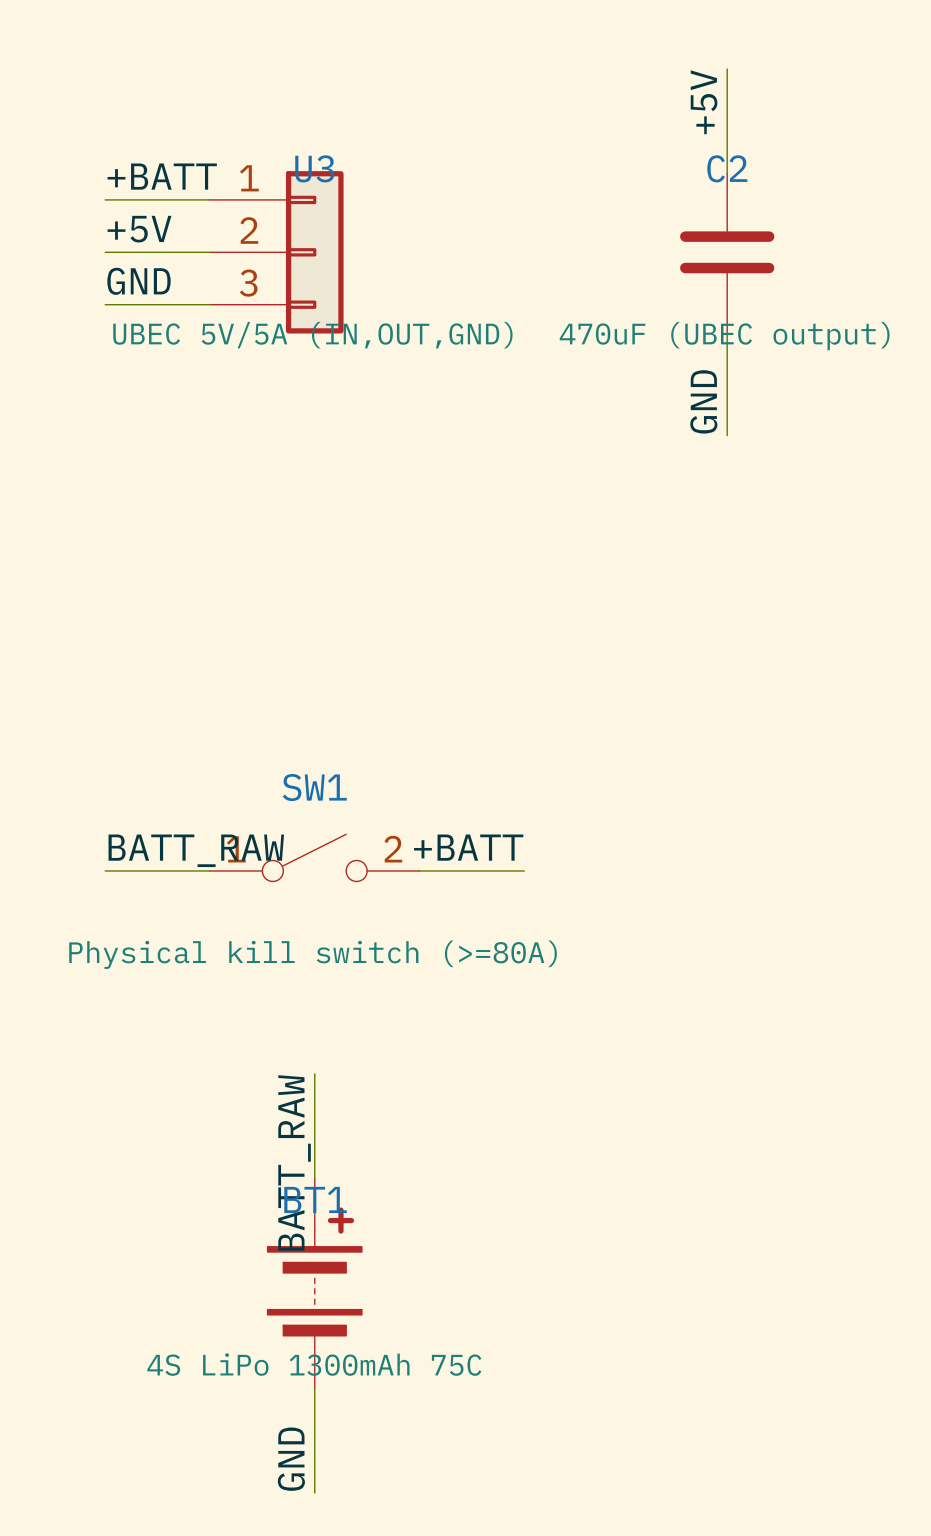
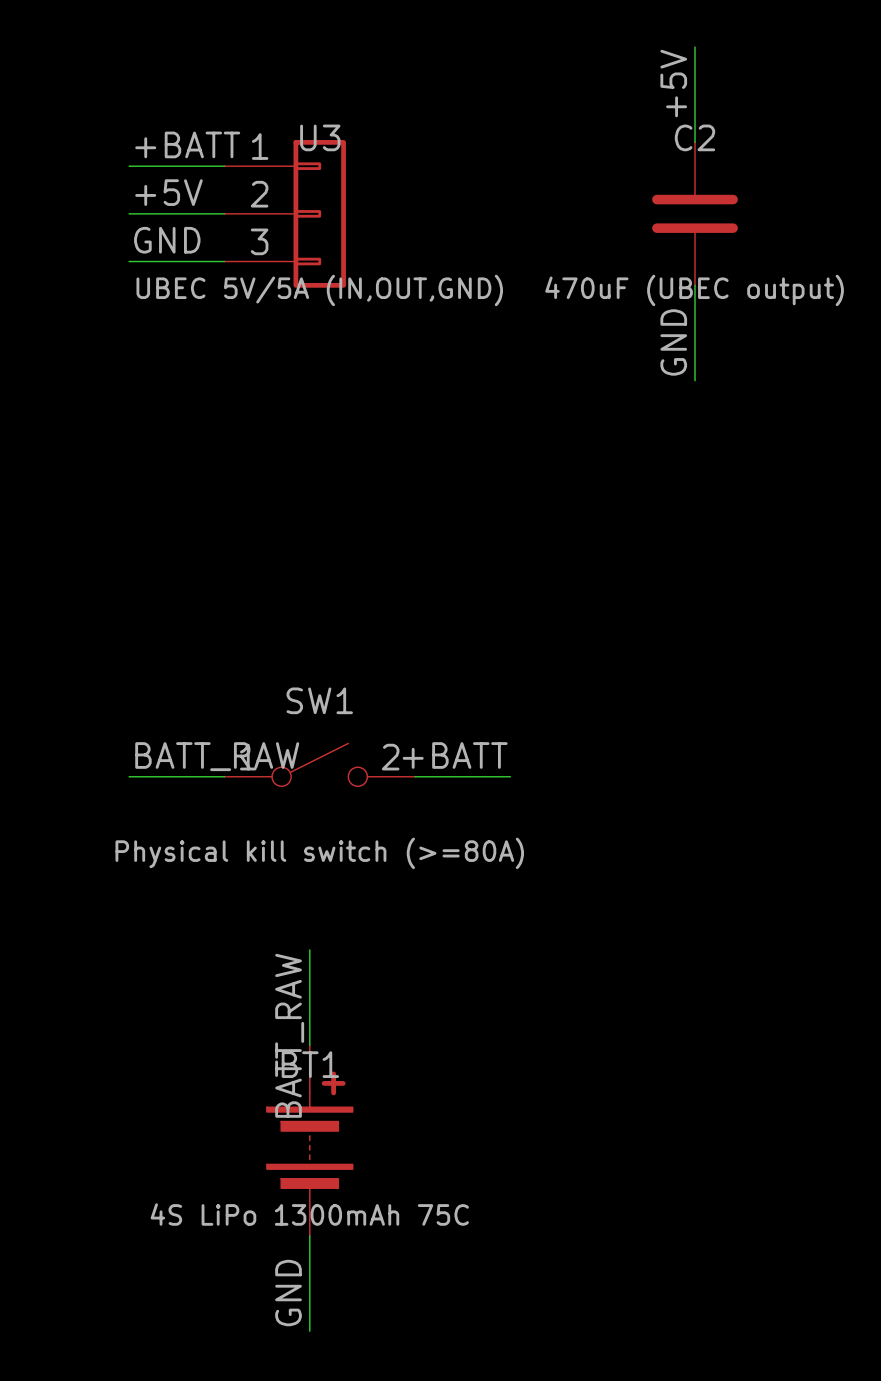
wire: (314, 1073) (314, 1178) -> (309, 949) (309, 1045)
label position: BATT_RAW (294, 1162) -> BATT_RAW (289, 1035)
BT1 position: (314, 1283) -> (309, 1140)
wire: (314, 1388) (314, 1492) -> (309, 1235) (309, 1331)
label position: GND (291, 1459) -> GND (288, 1293)

